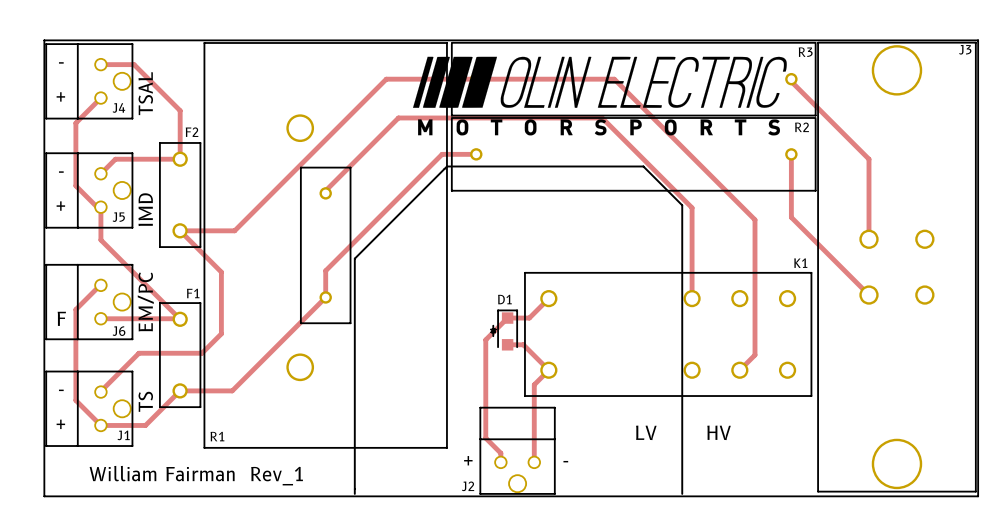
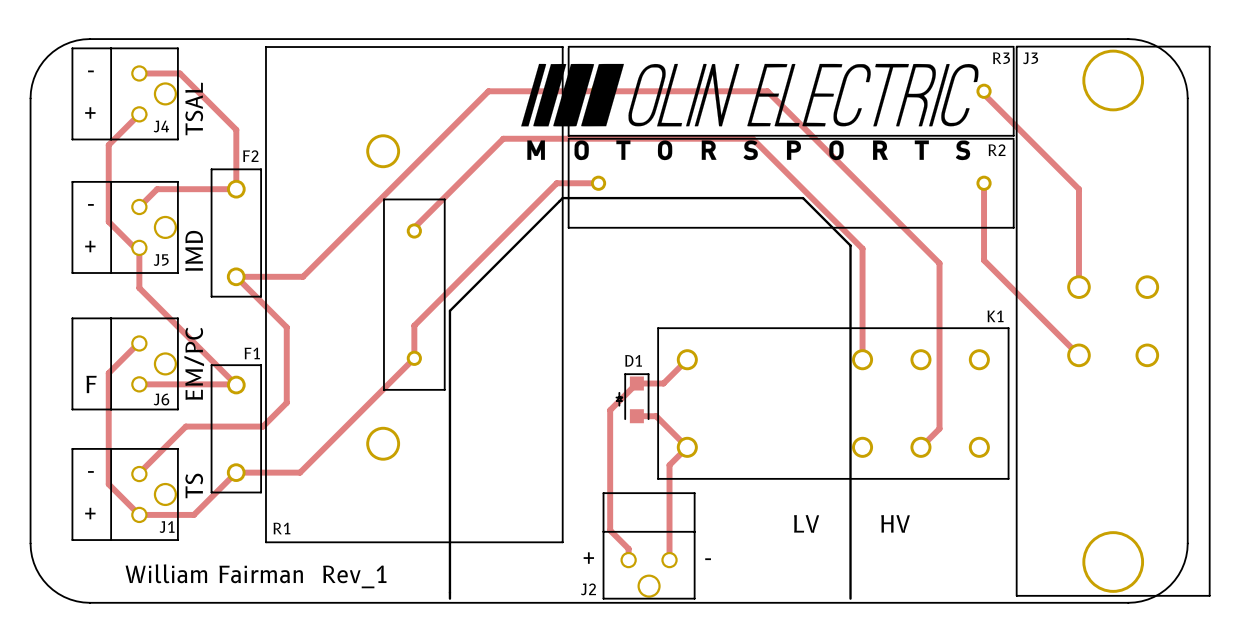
board edge: (44, 40) (978, 40) (978, 496) (44, 496) (44, 40) -> (89, 39) (64, 44) (47, 56) (36, 72) (30, 98) (30, 550) (39, 575) (52, 589) (64, 596) (89, 602) (1128, 602) (1147, 599) (1159, 593) (1170, 585) (1181, 569) (1187, 543) (1187, 98) (1186, 85) (1178, 66) (1165, 52) (1154, 44) (1128, 39) (89, 39)
J3 name position: J3 (965, 49) -> J3 (1030, 58)

